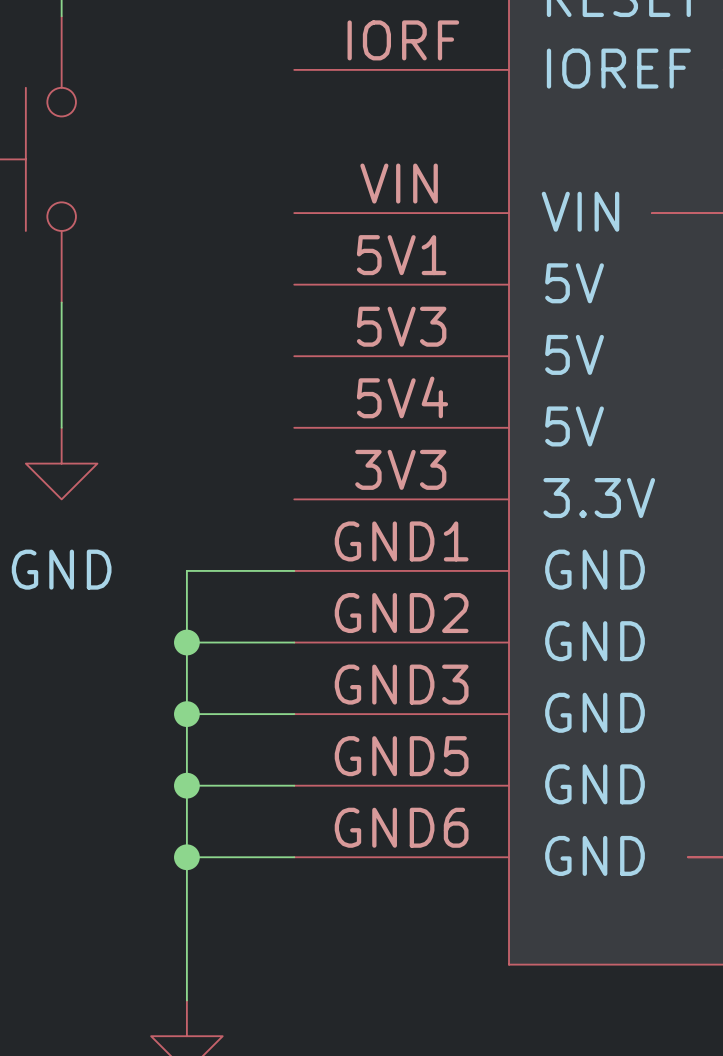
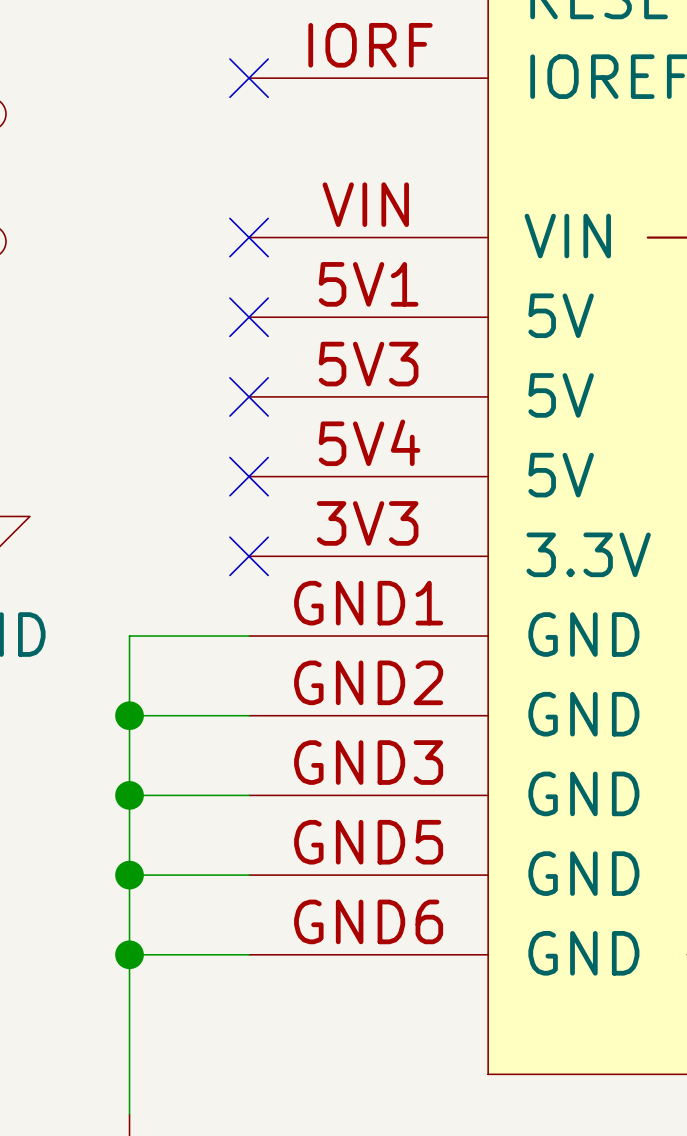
no-connect mark: none -> (249, 78)
no-connect mark: none -> (249, 237)
no-connect mark: none -> (249, 317)
no-connect mark: none -> (249, 396)
no-connect mark: none -> (249, 476)
no-connect mark: none -> (249, 556)

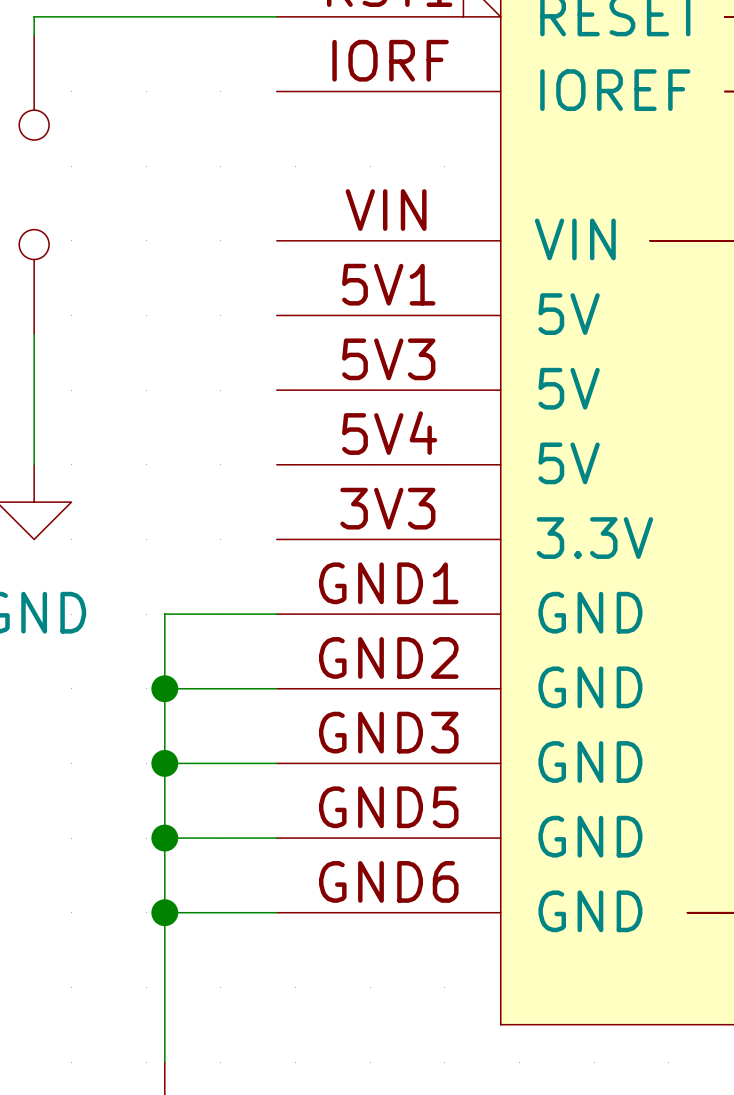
no-connect mark: (249, 78) -> none
no-connect mark: (249, 237) -> none
no-connect mark: (249, 317) -> none
no-connect mark: (249, 396) -> none
no-connect mark: (249, 476) -> none
no-connect mark: (249, 556) -> none

